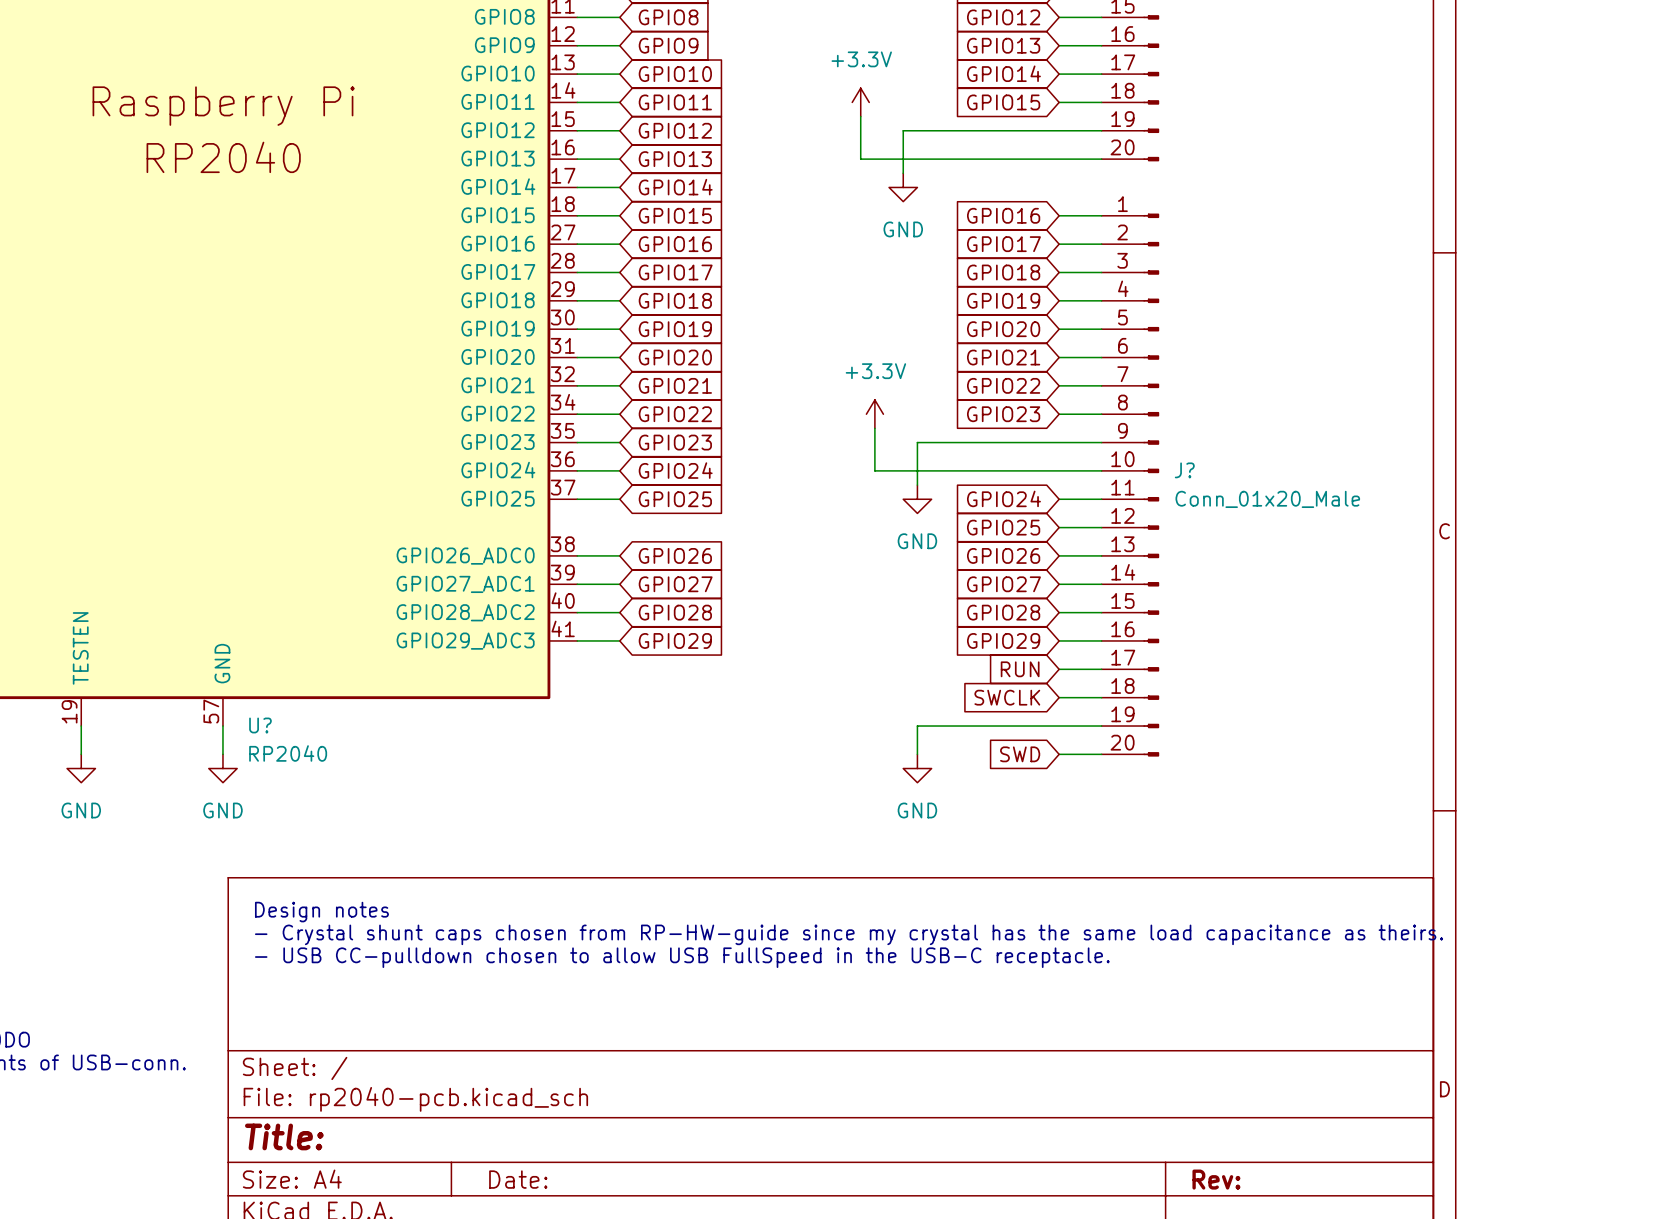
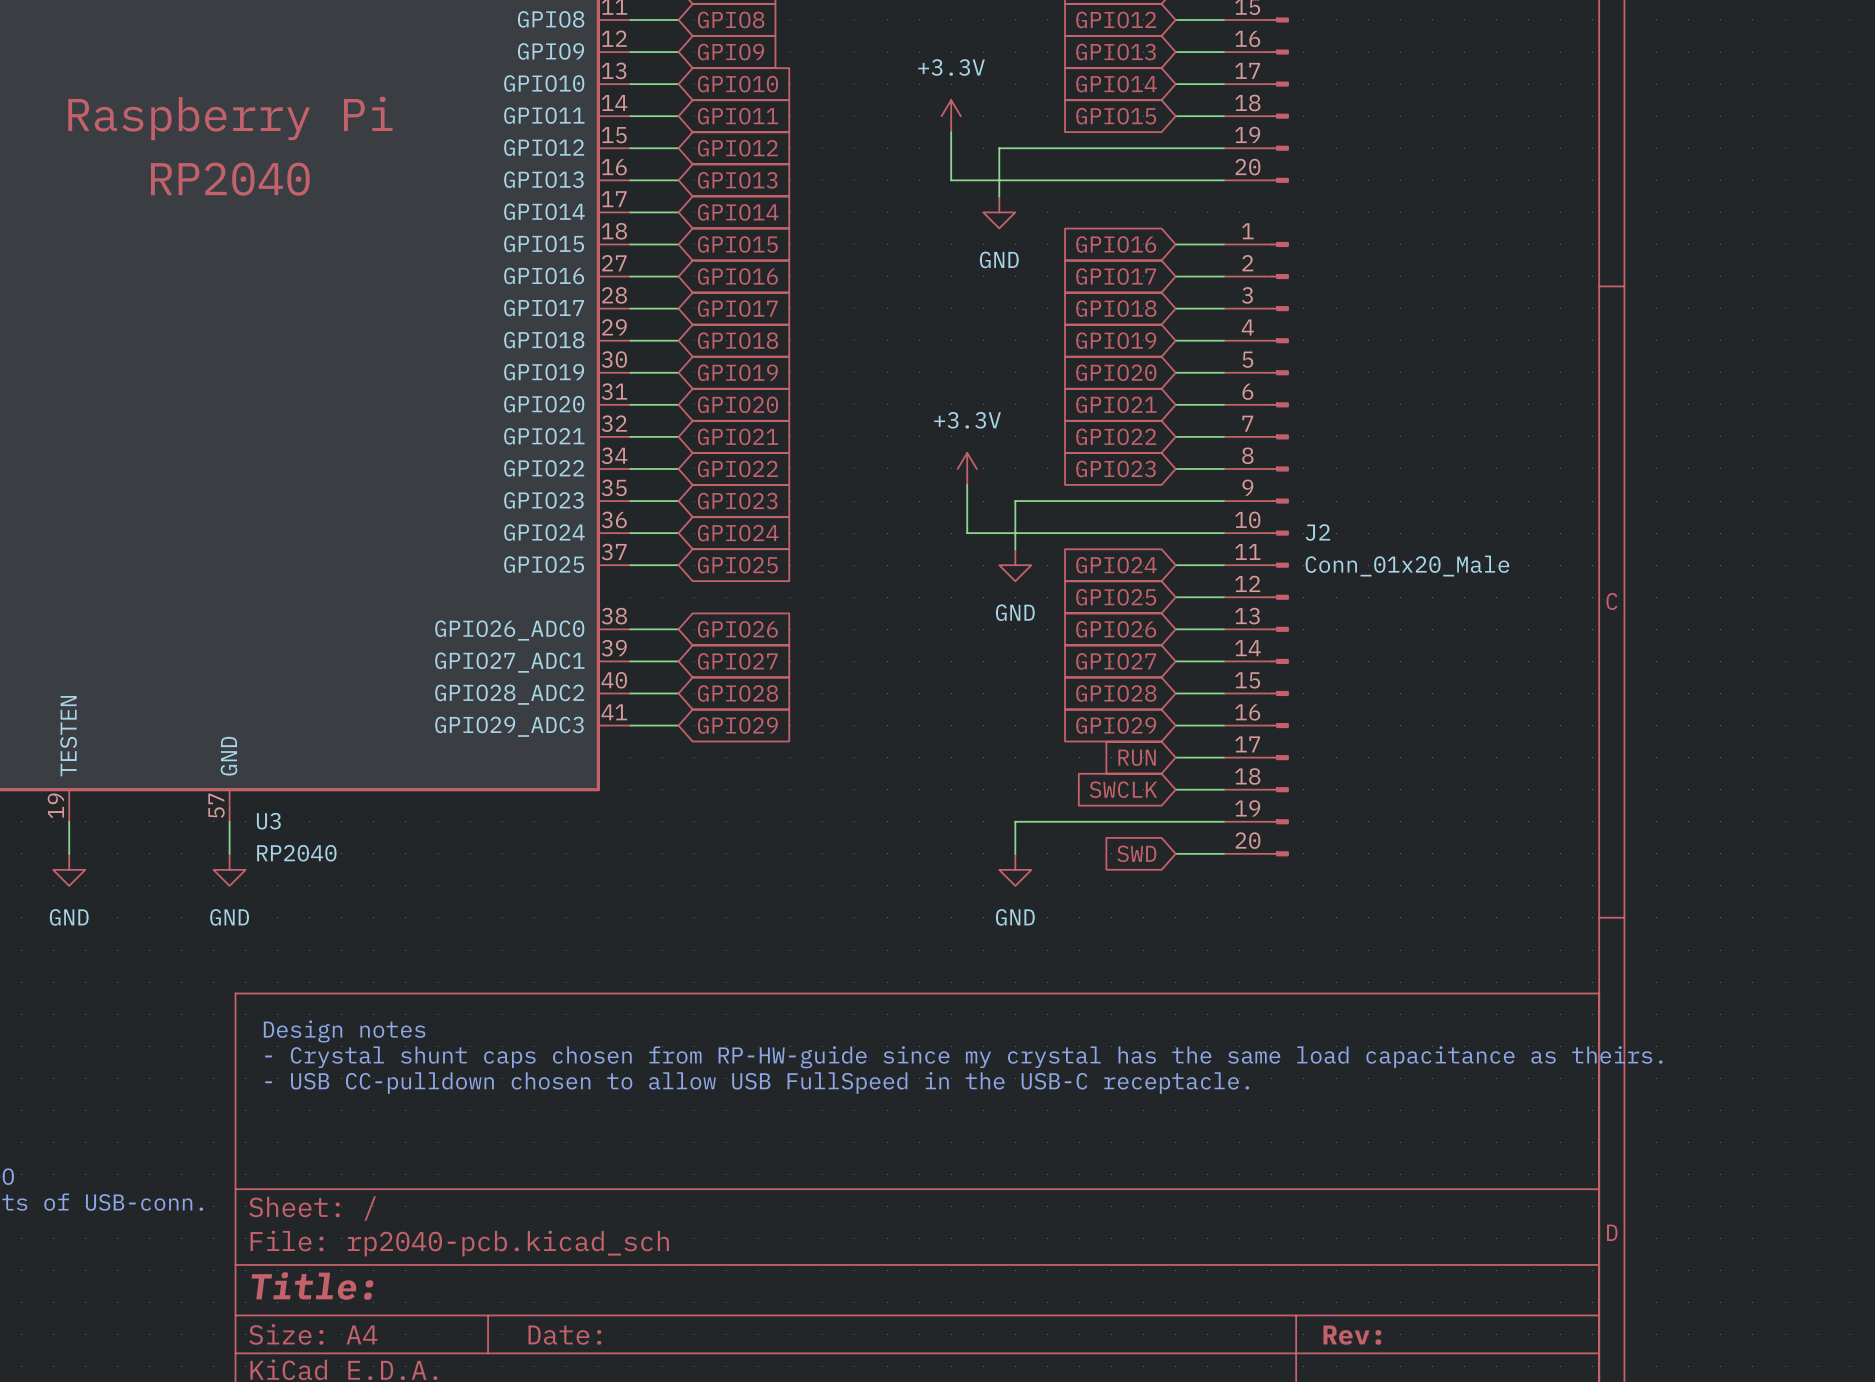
J? name: J? (1184, 470) -> J2 (1317, 532)
U? name: U? (260, 725) -> U3 (268, 821)

